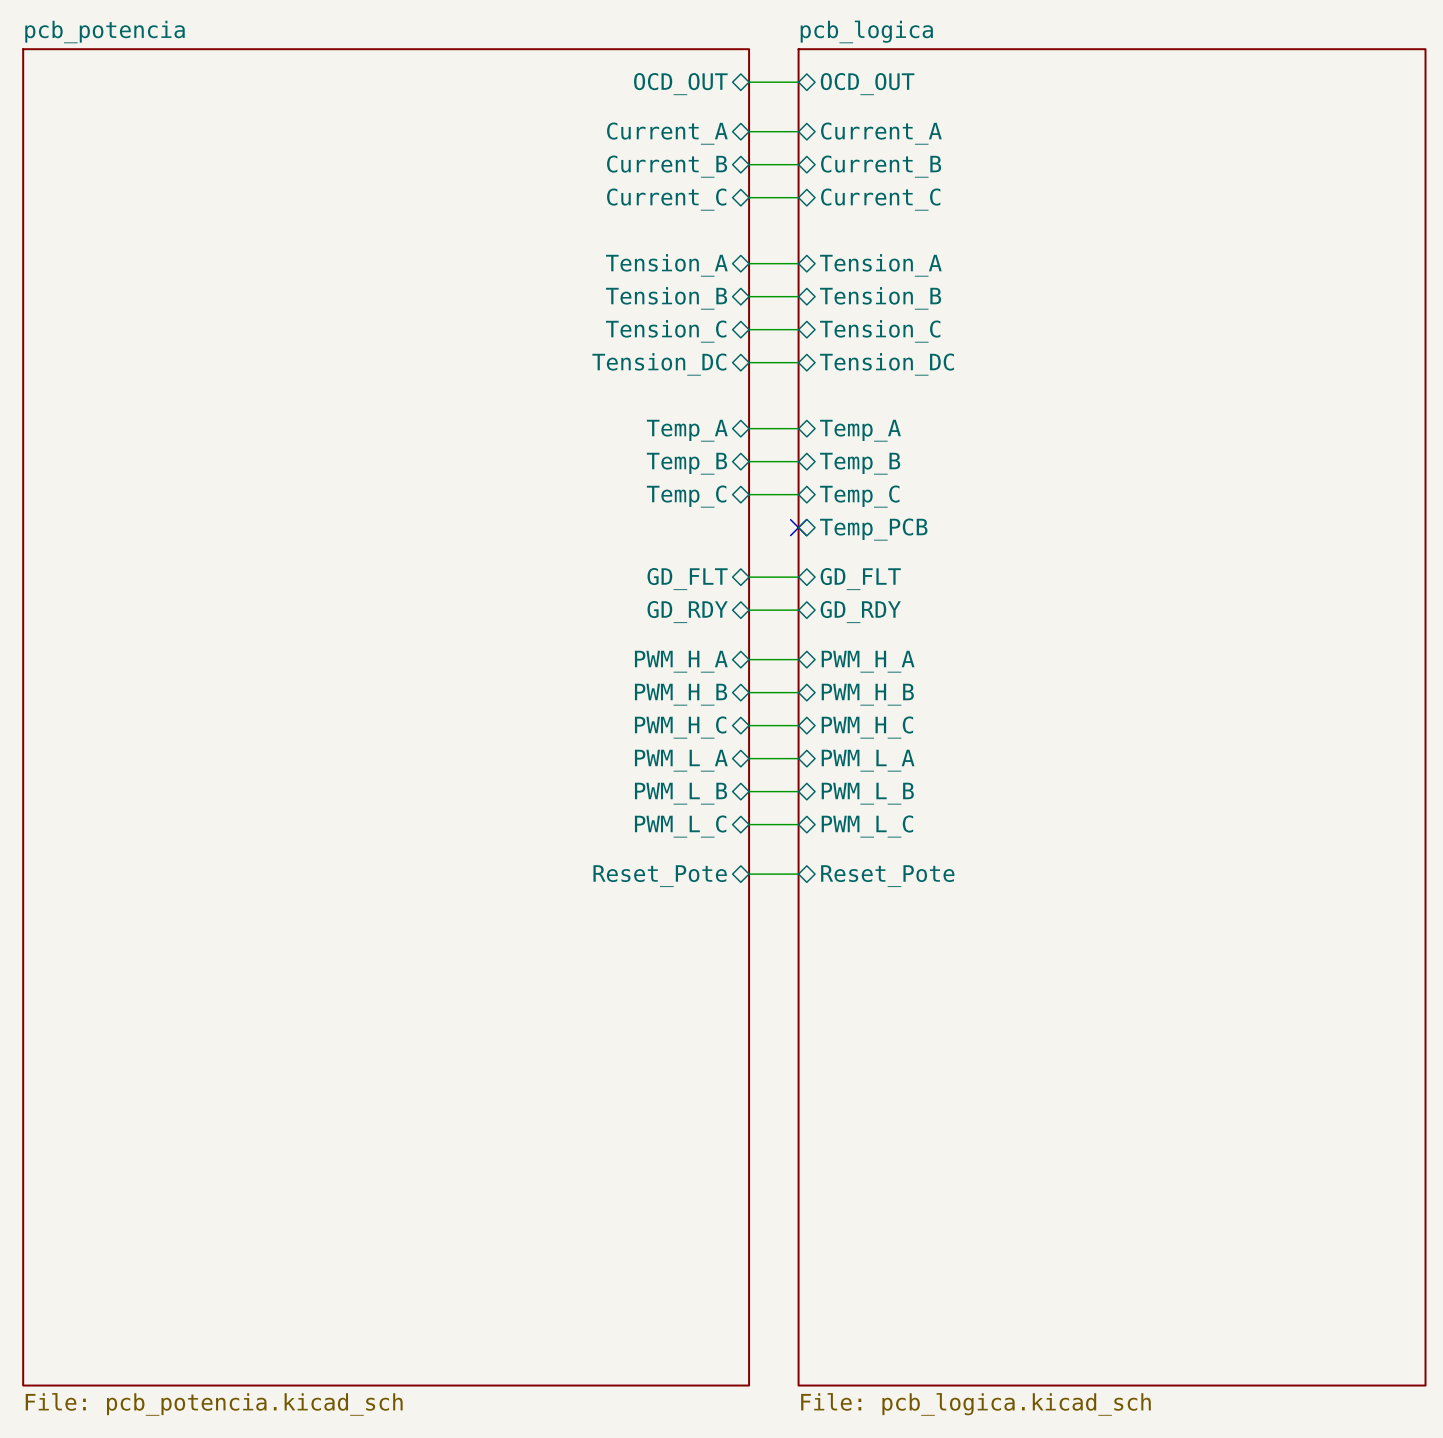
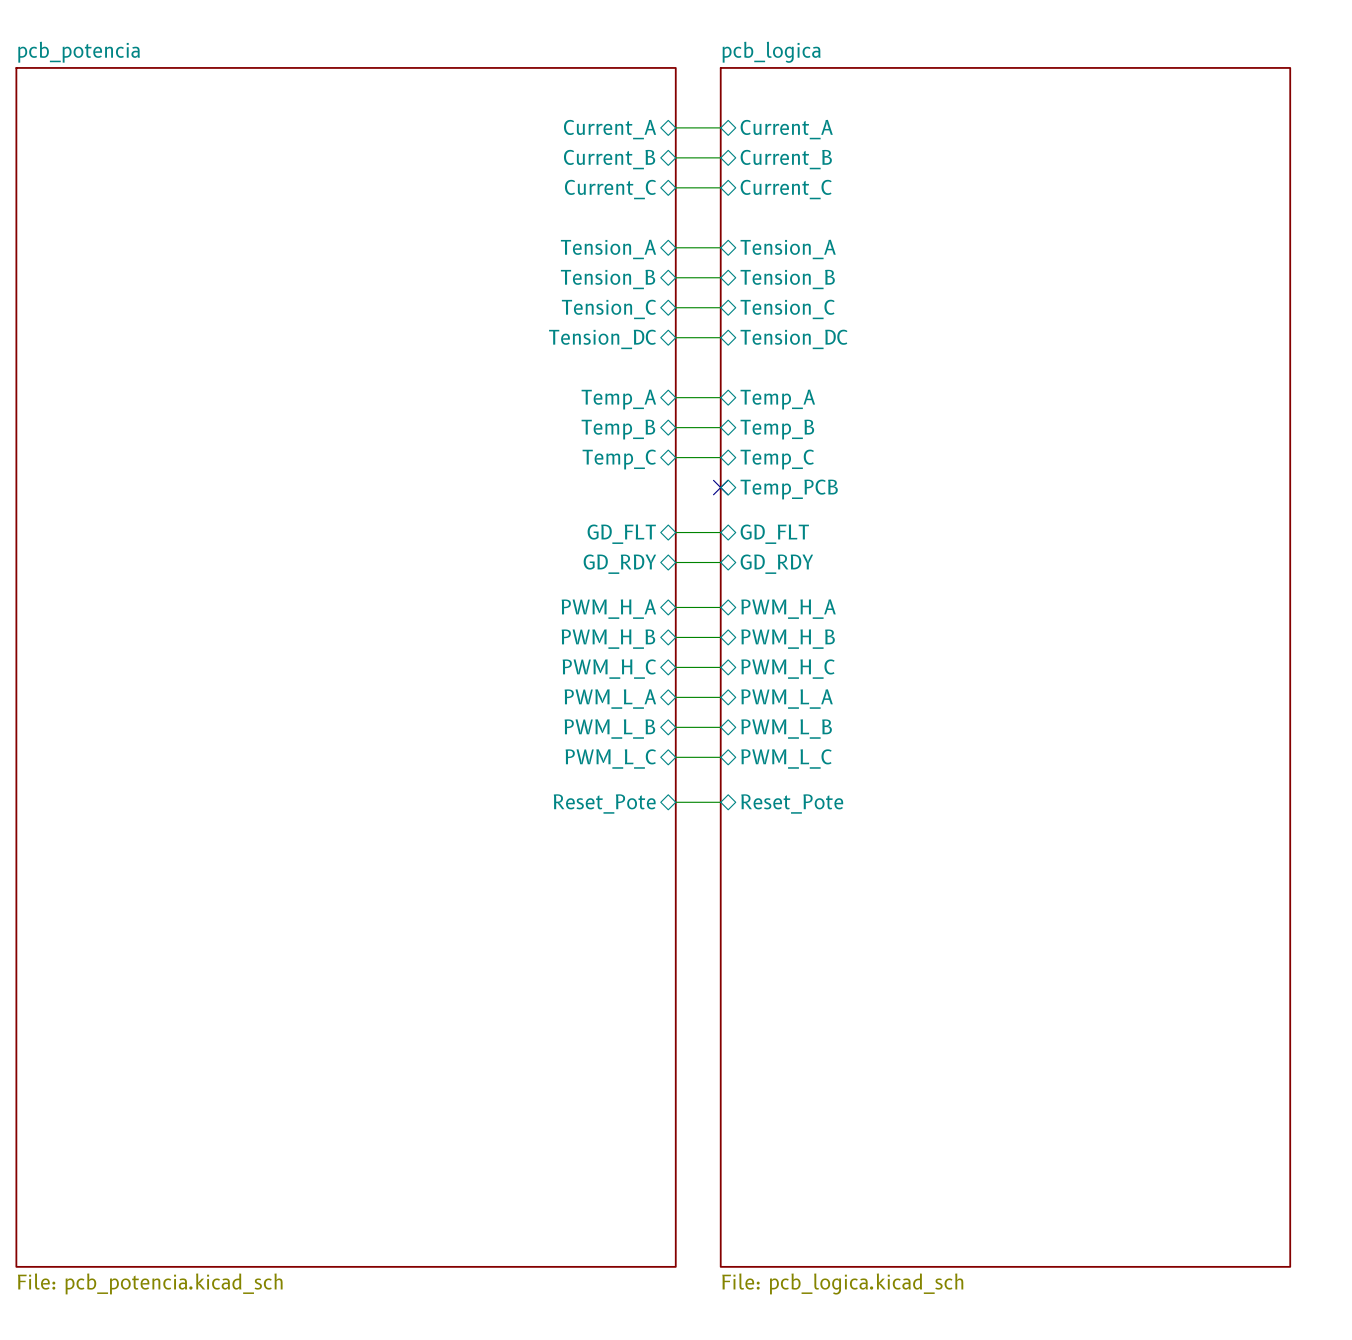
sheet pcb_potencia shape: [22, 48, 751, 1387] -> [15, 67, 677, 1268]
sheet pcb_logica shape: [797, 48, 1427, 1387] -> [719, 67, 1292, 1268]
wire: (749, 82) (798, 82) -> none
sheet pin: OCD_OUT (680, 84) -> none
sheet pin: OCD_OUT (867, 84) -> none

